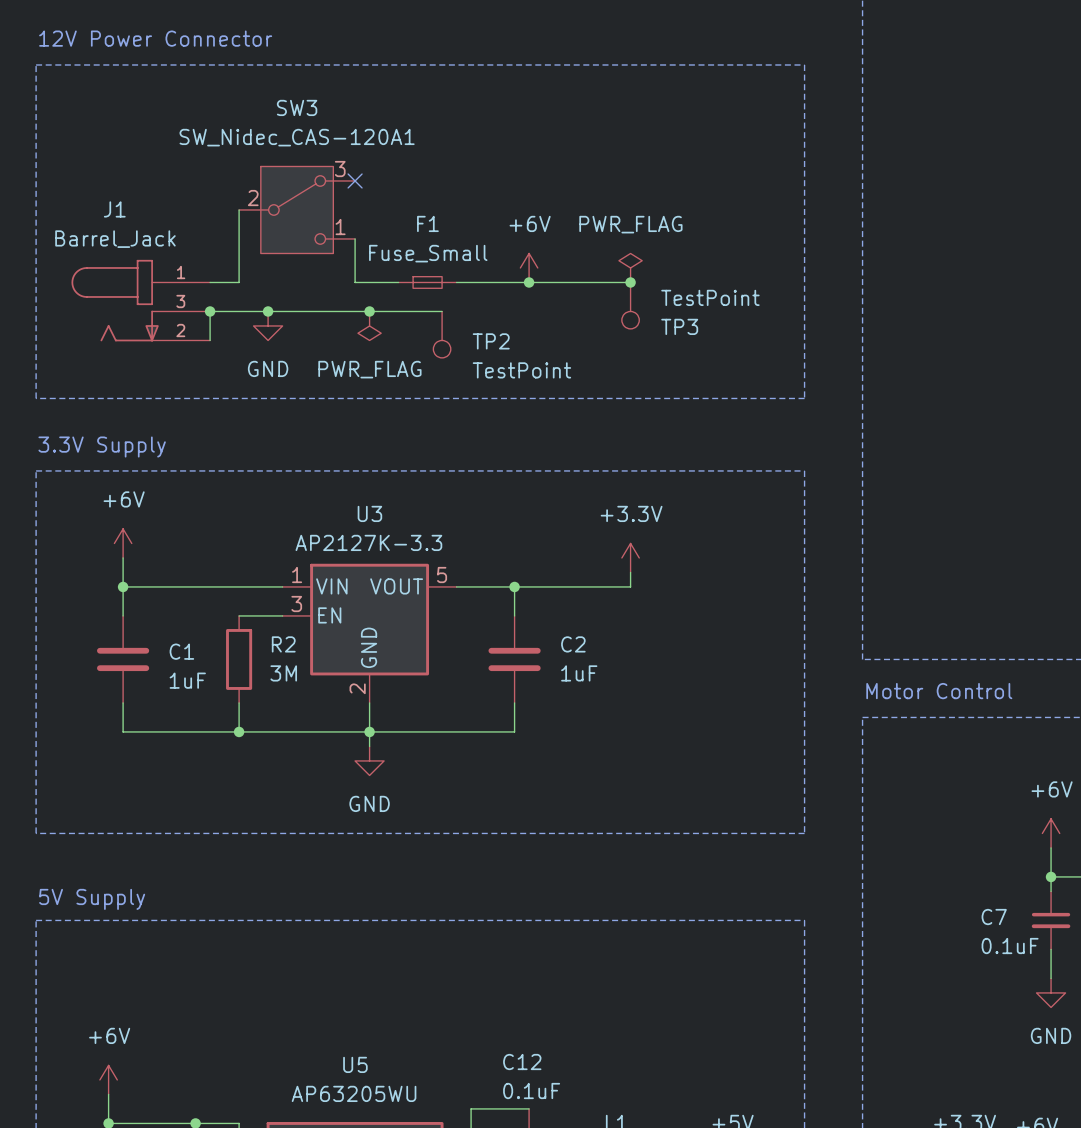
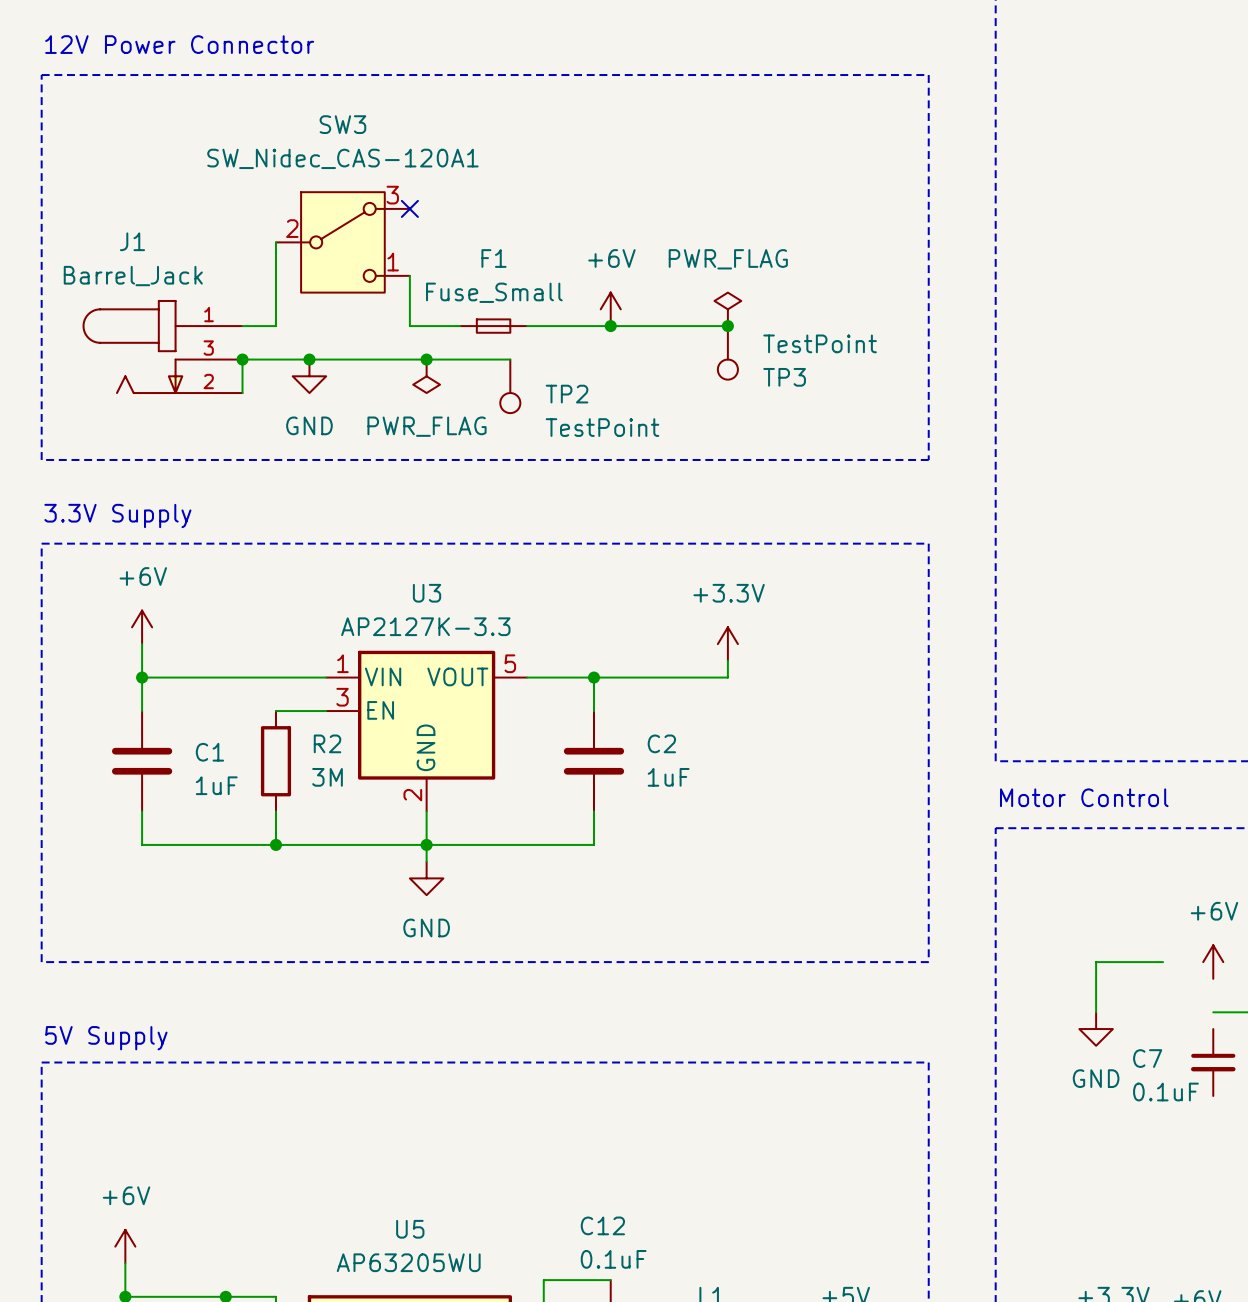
wire: none -> (1163, 962) (1096, 962) (1096, 1012)
wire: (1051, 847) (1051, 891) -> none
junction: (1051, 876) -> none
power symbol: none -> GND (1096, 1029)
wire: (1051, 949) (1051, 978) -> none
power symbol: GND (1051, 992) -> none

